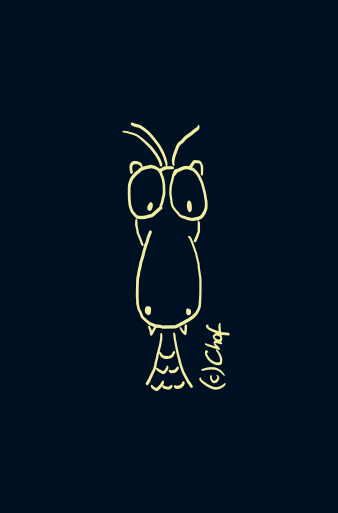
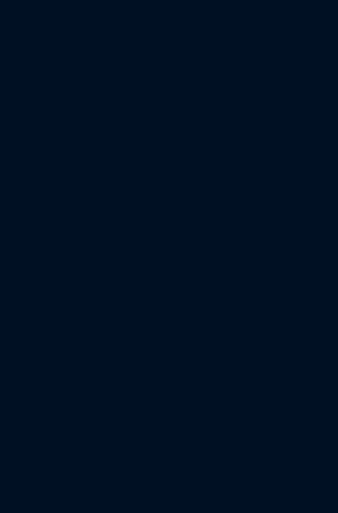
drawing: [122, 122, 230, 391] -> none

